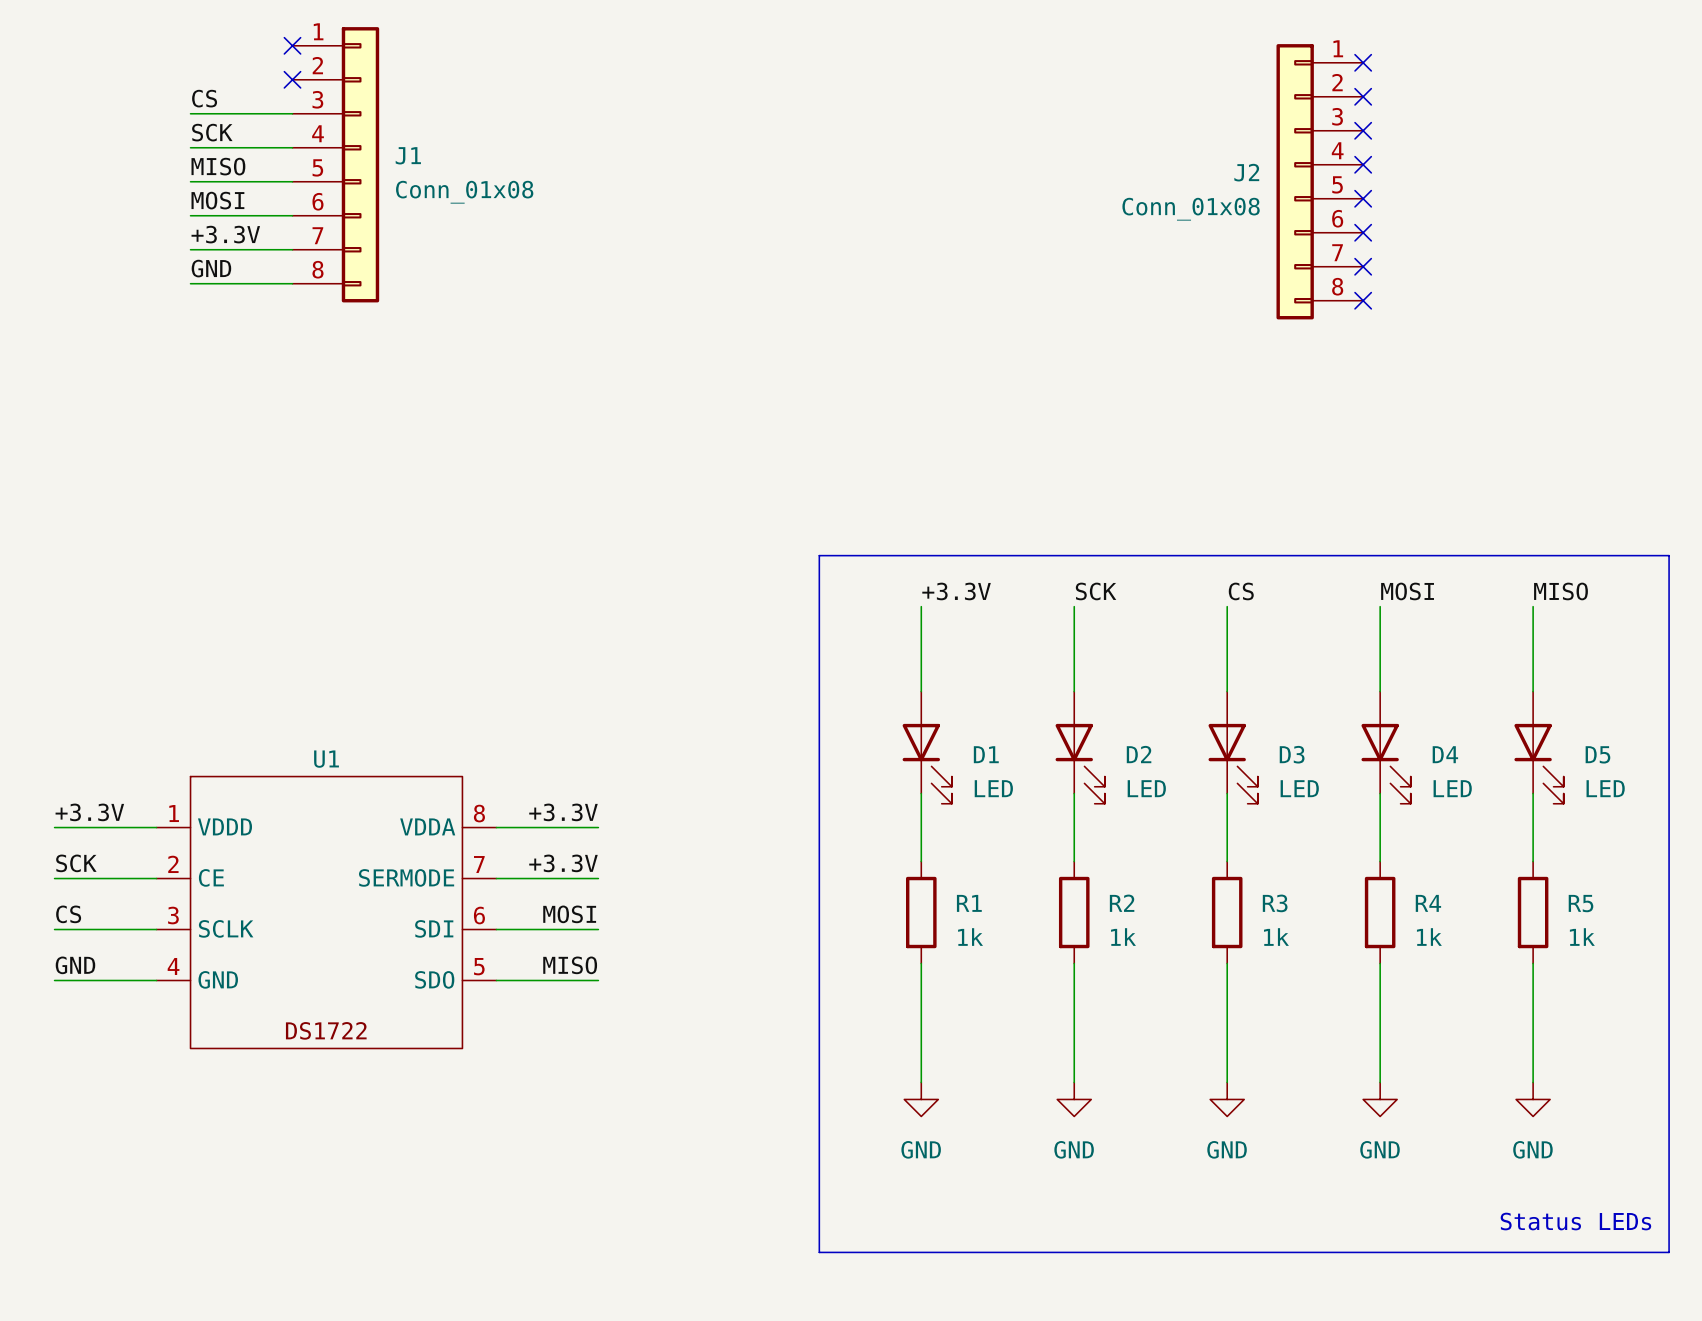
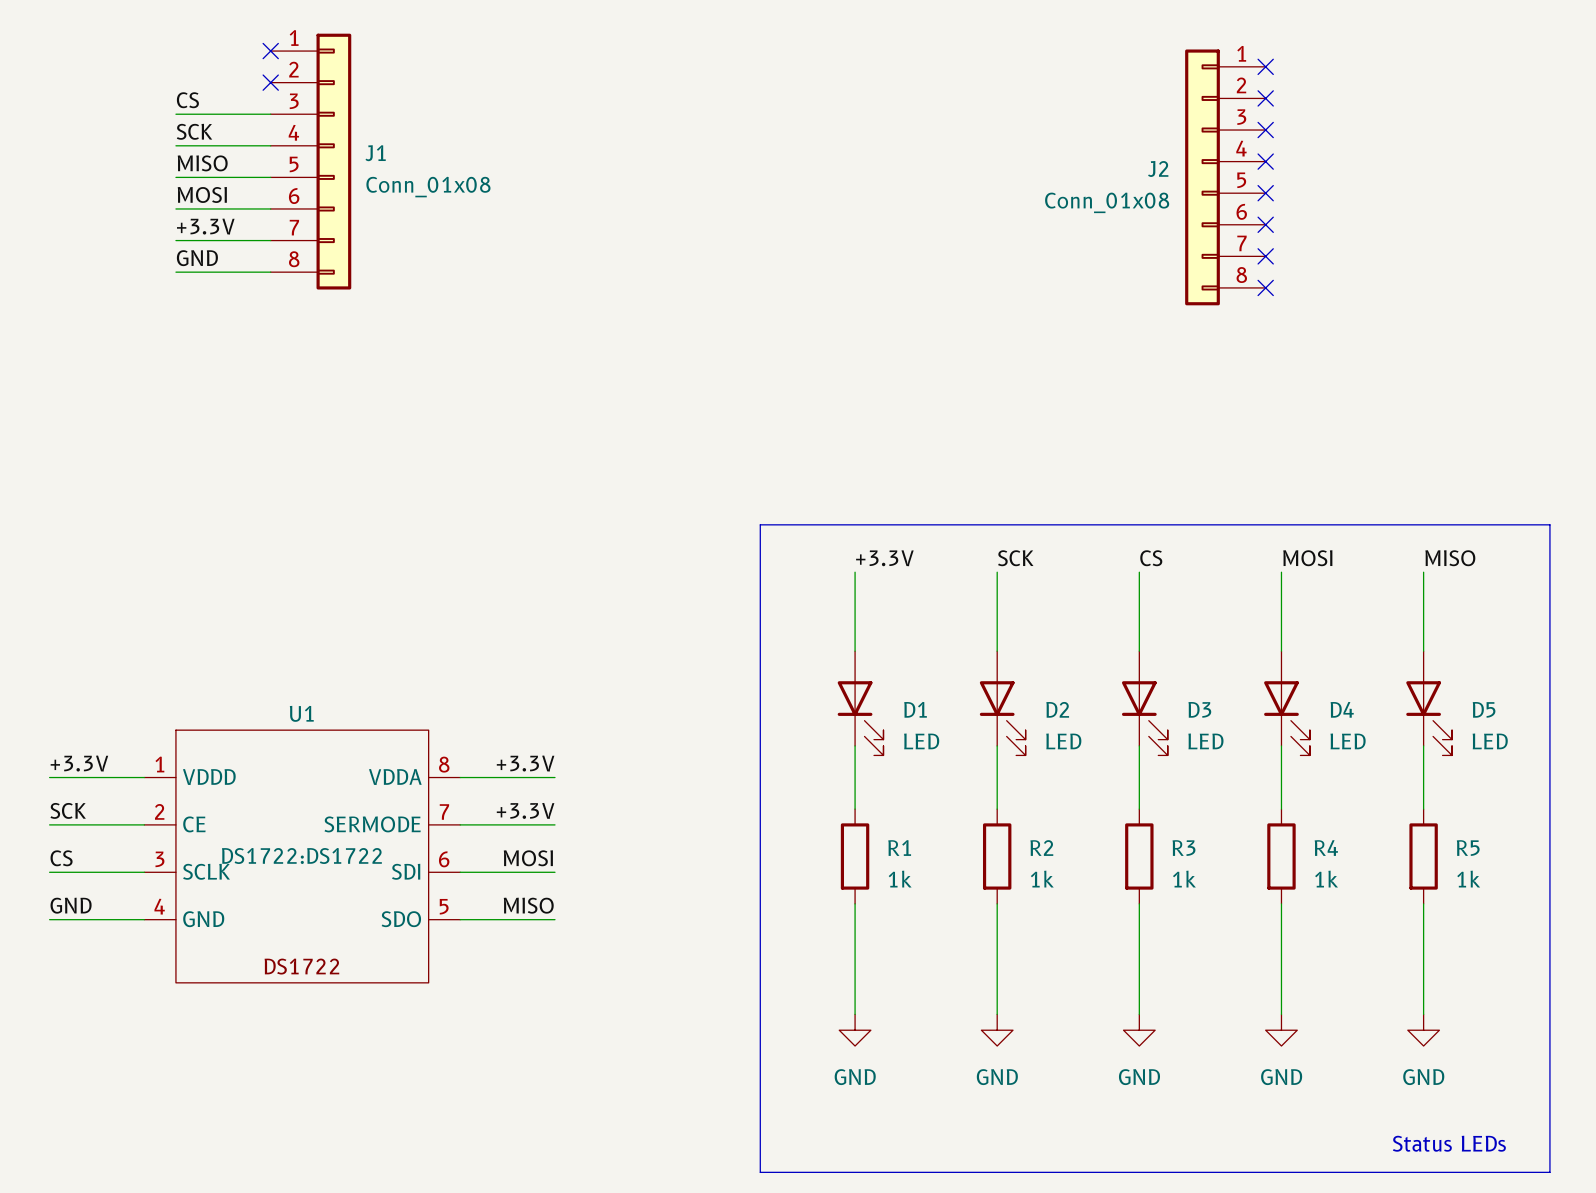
U1 text: none -> DS1722:DS1722 (301, 855)

